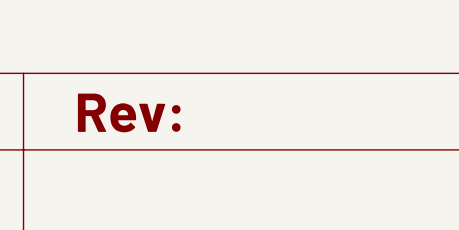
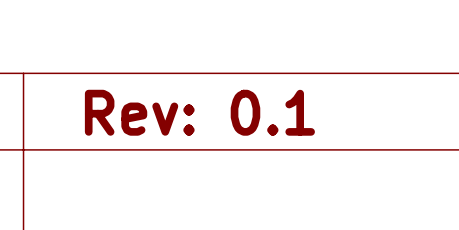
title block: Rev: (129, 112) -> Rev: 0.1 (199, 112)

